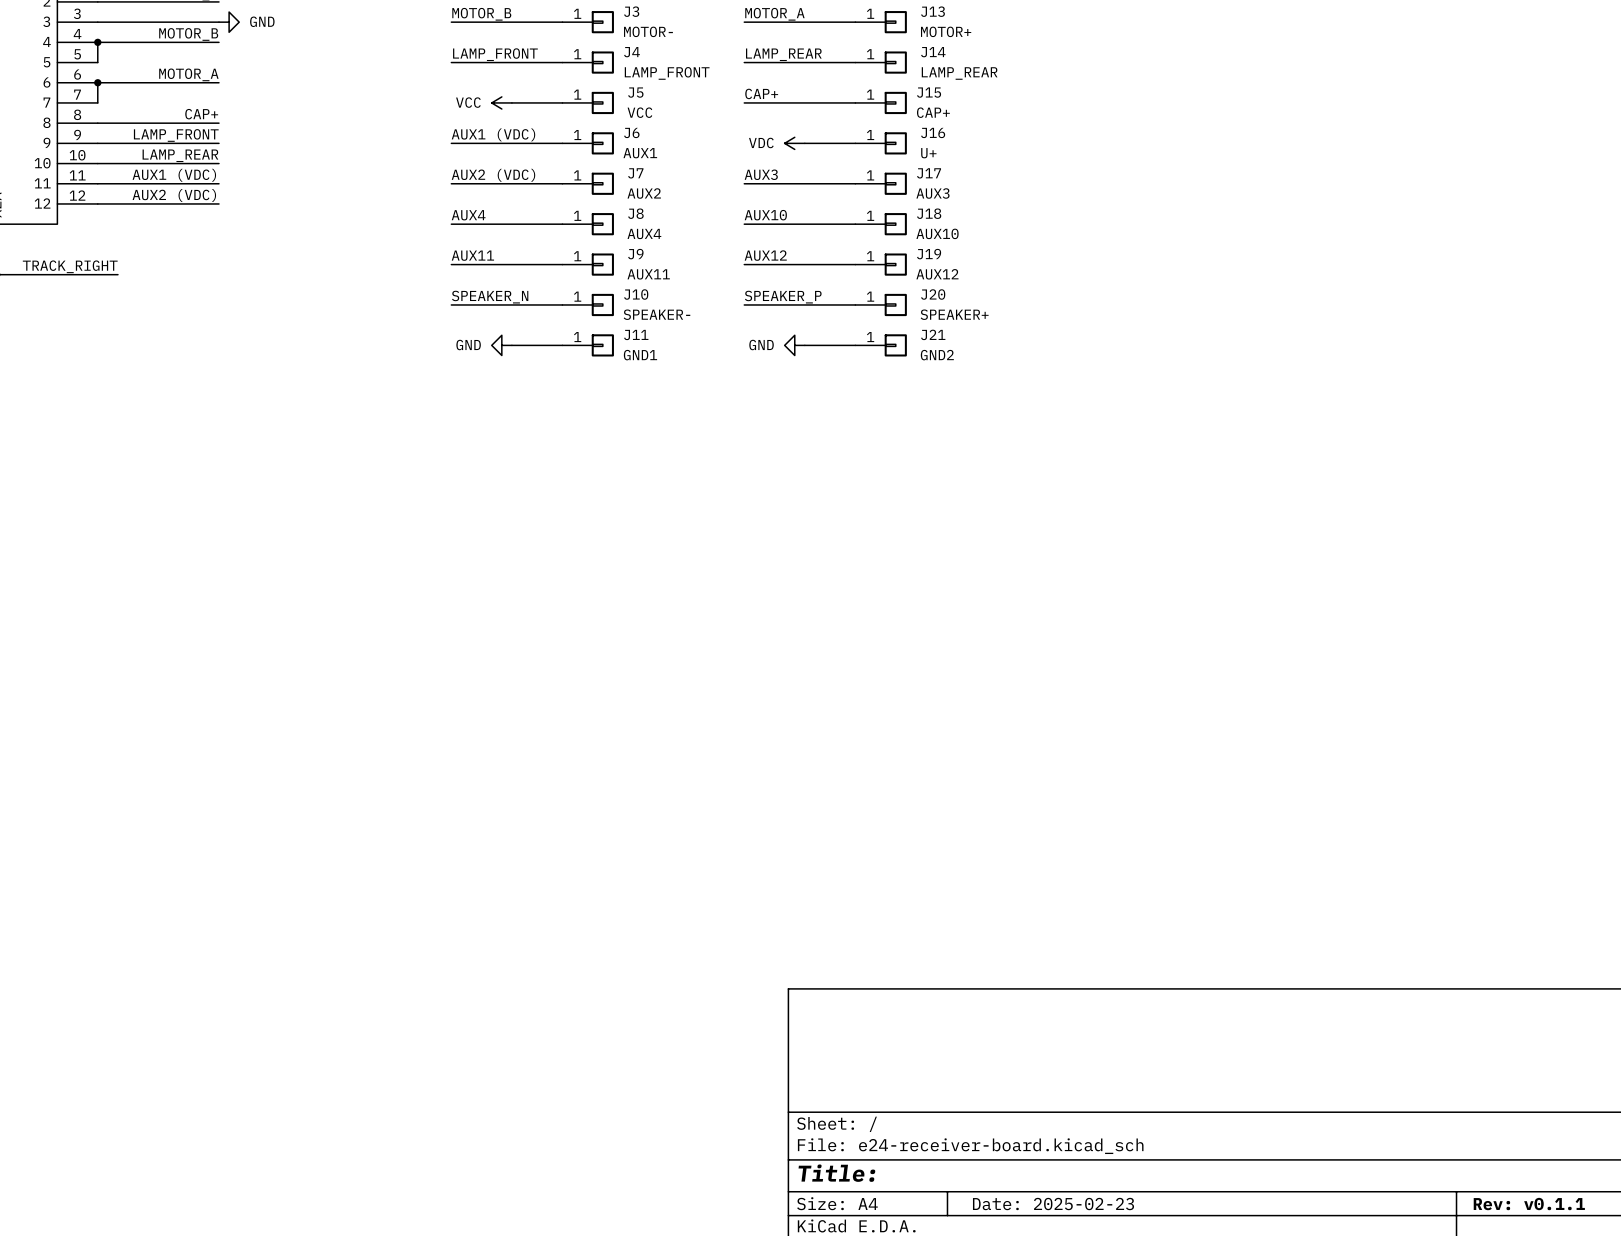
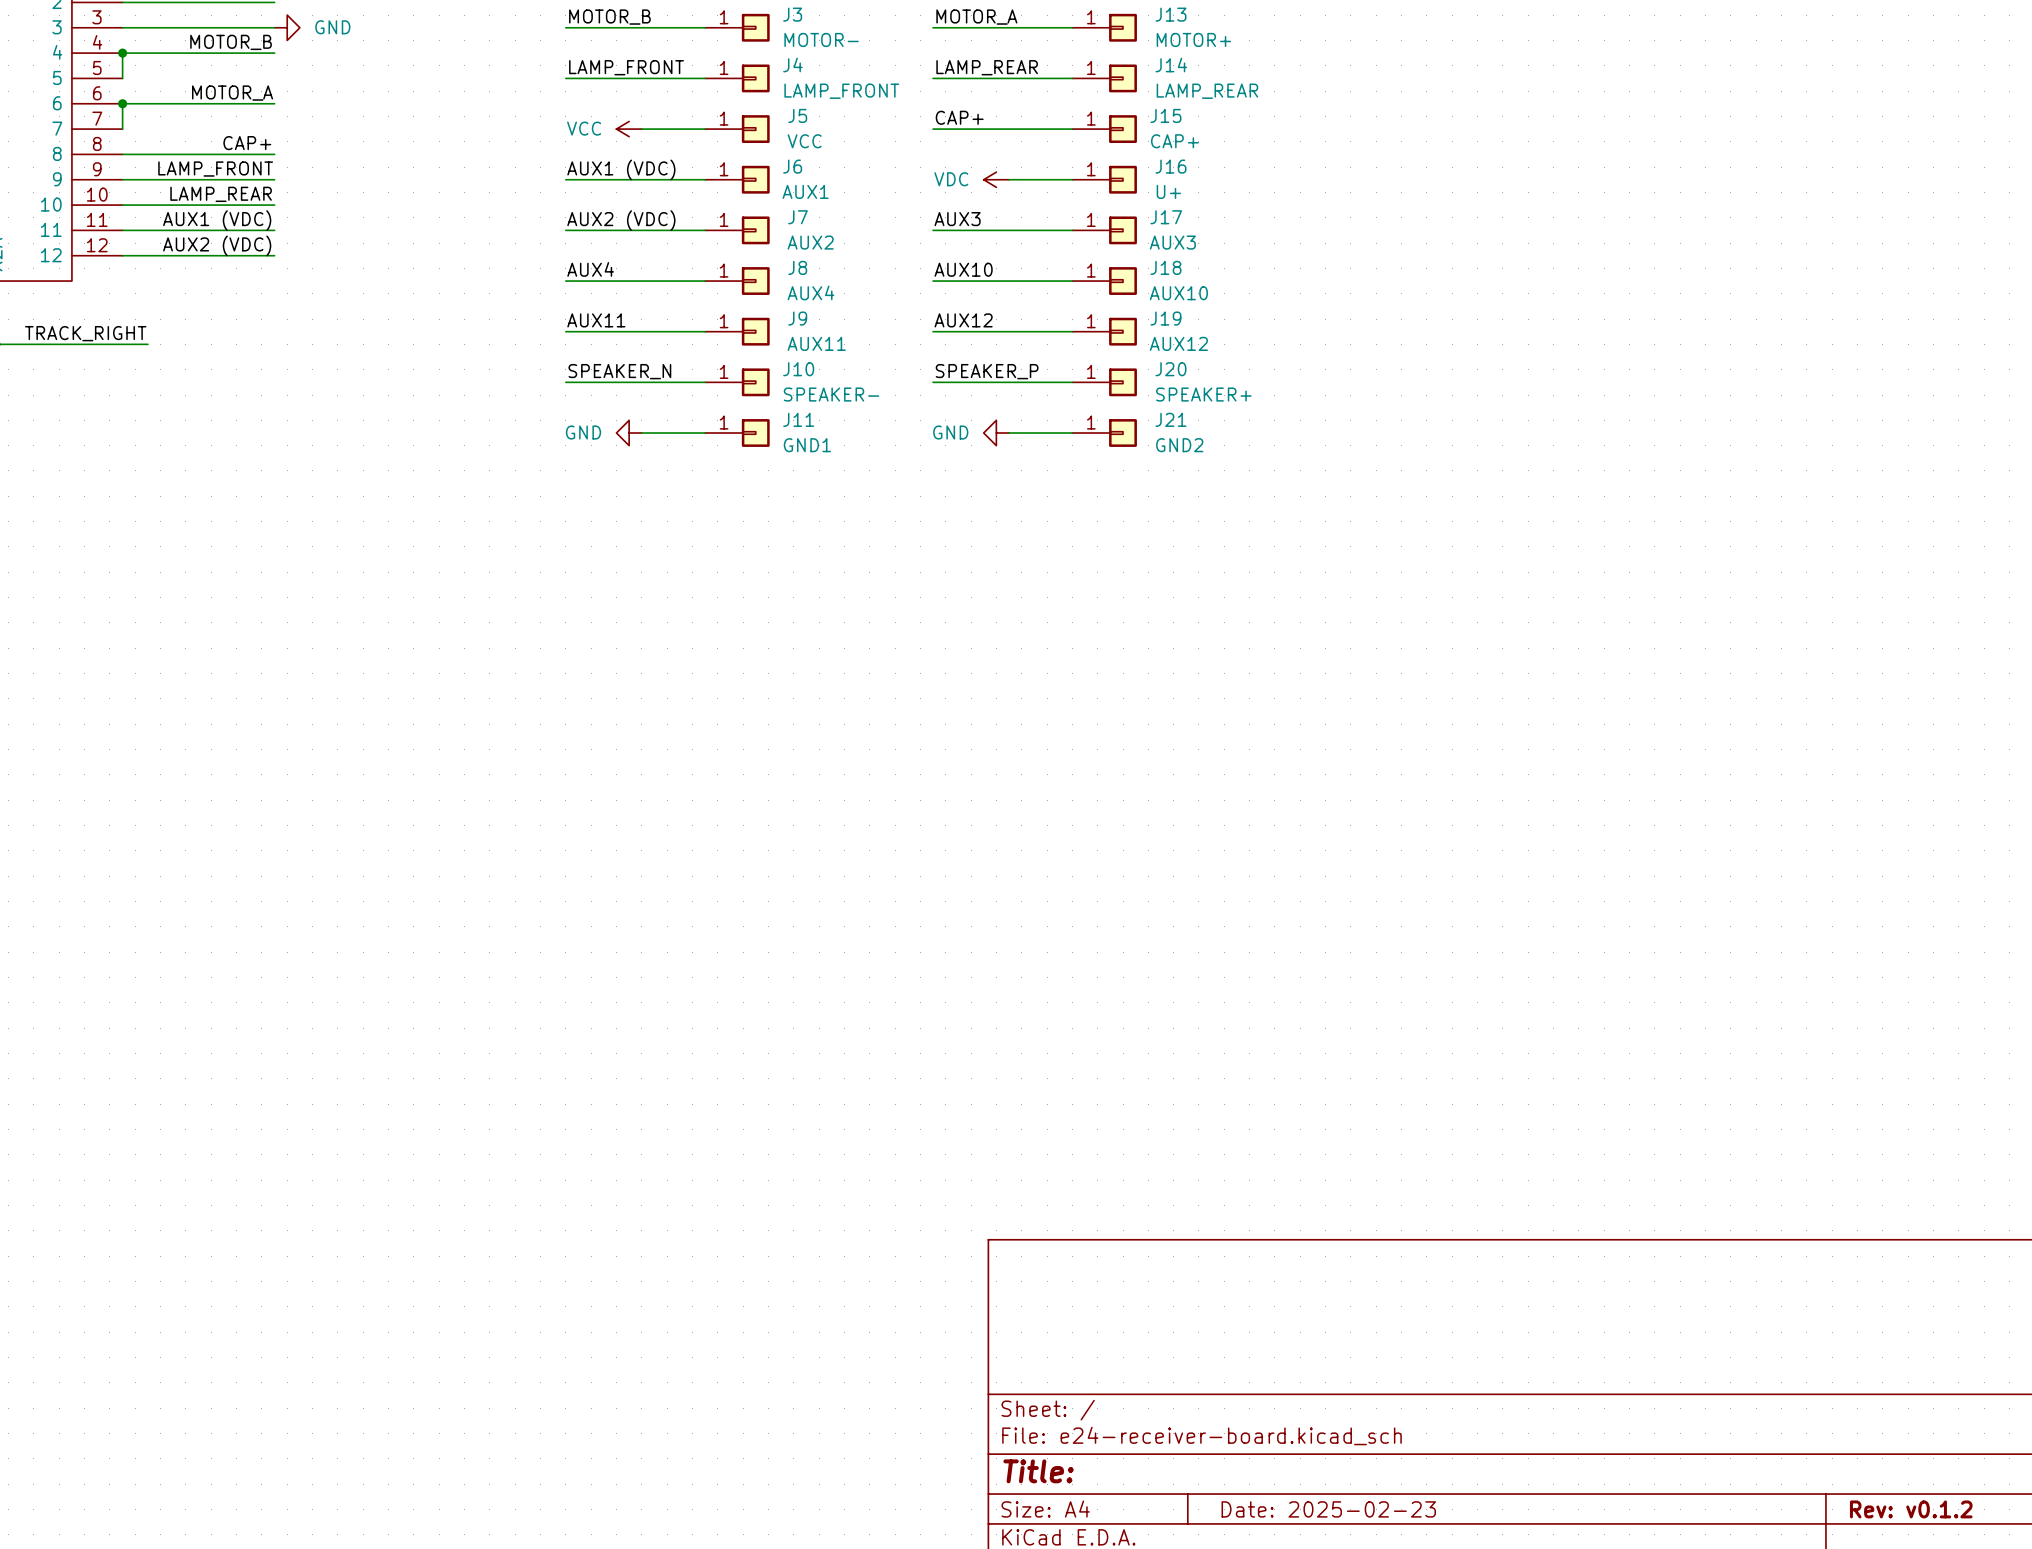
title block: Rev: v0.1.1 (1529, 1204) -> Rev: v0.1.2 (1911, 1509)

